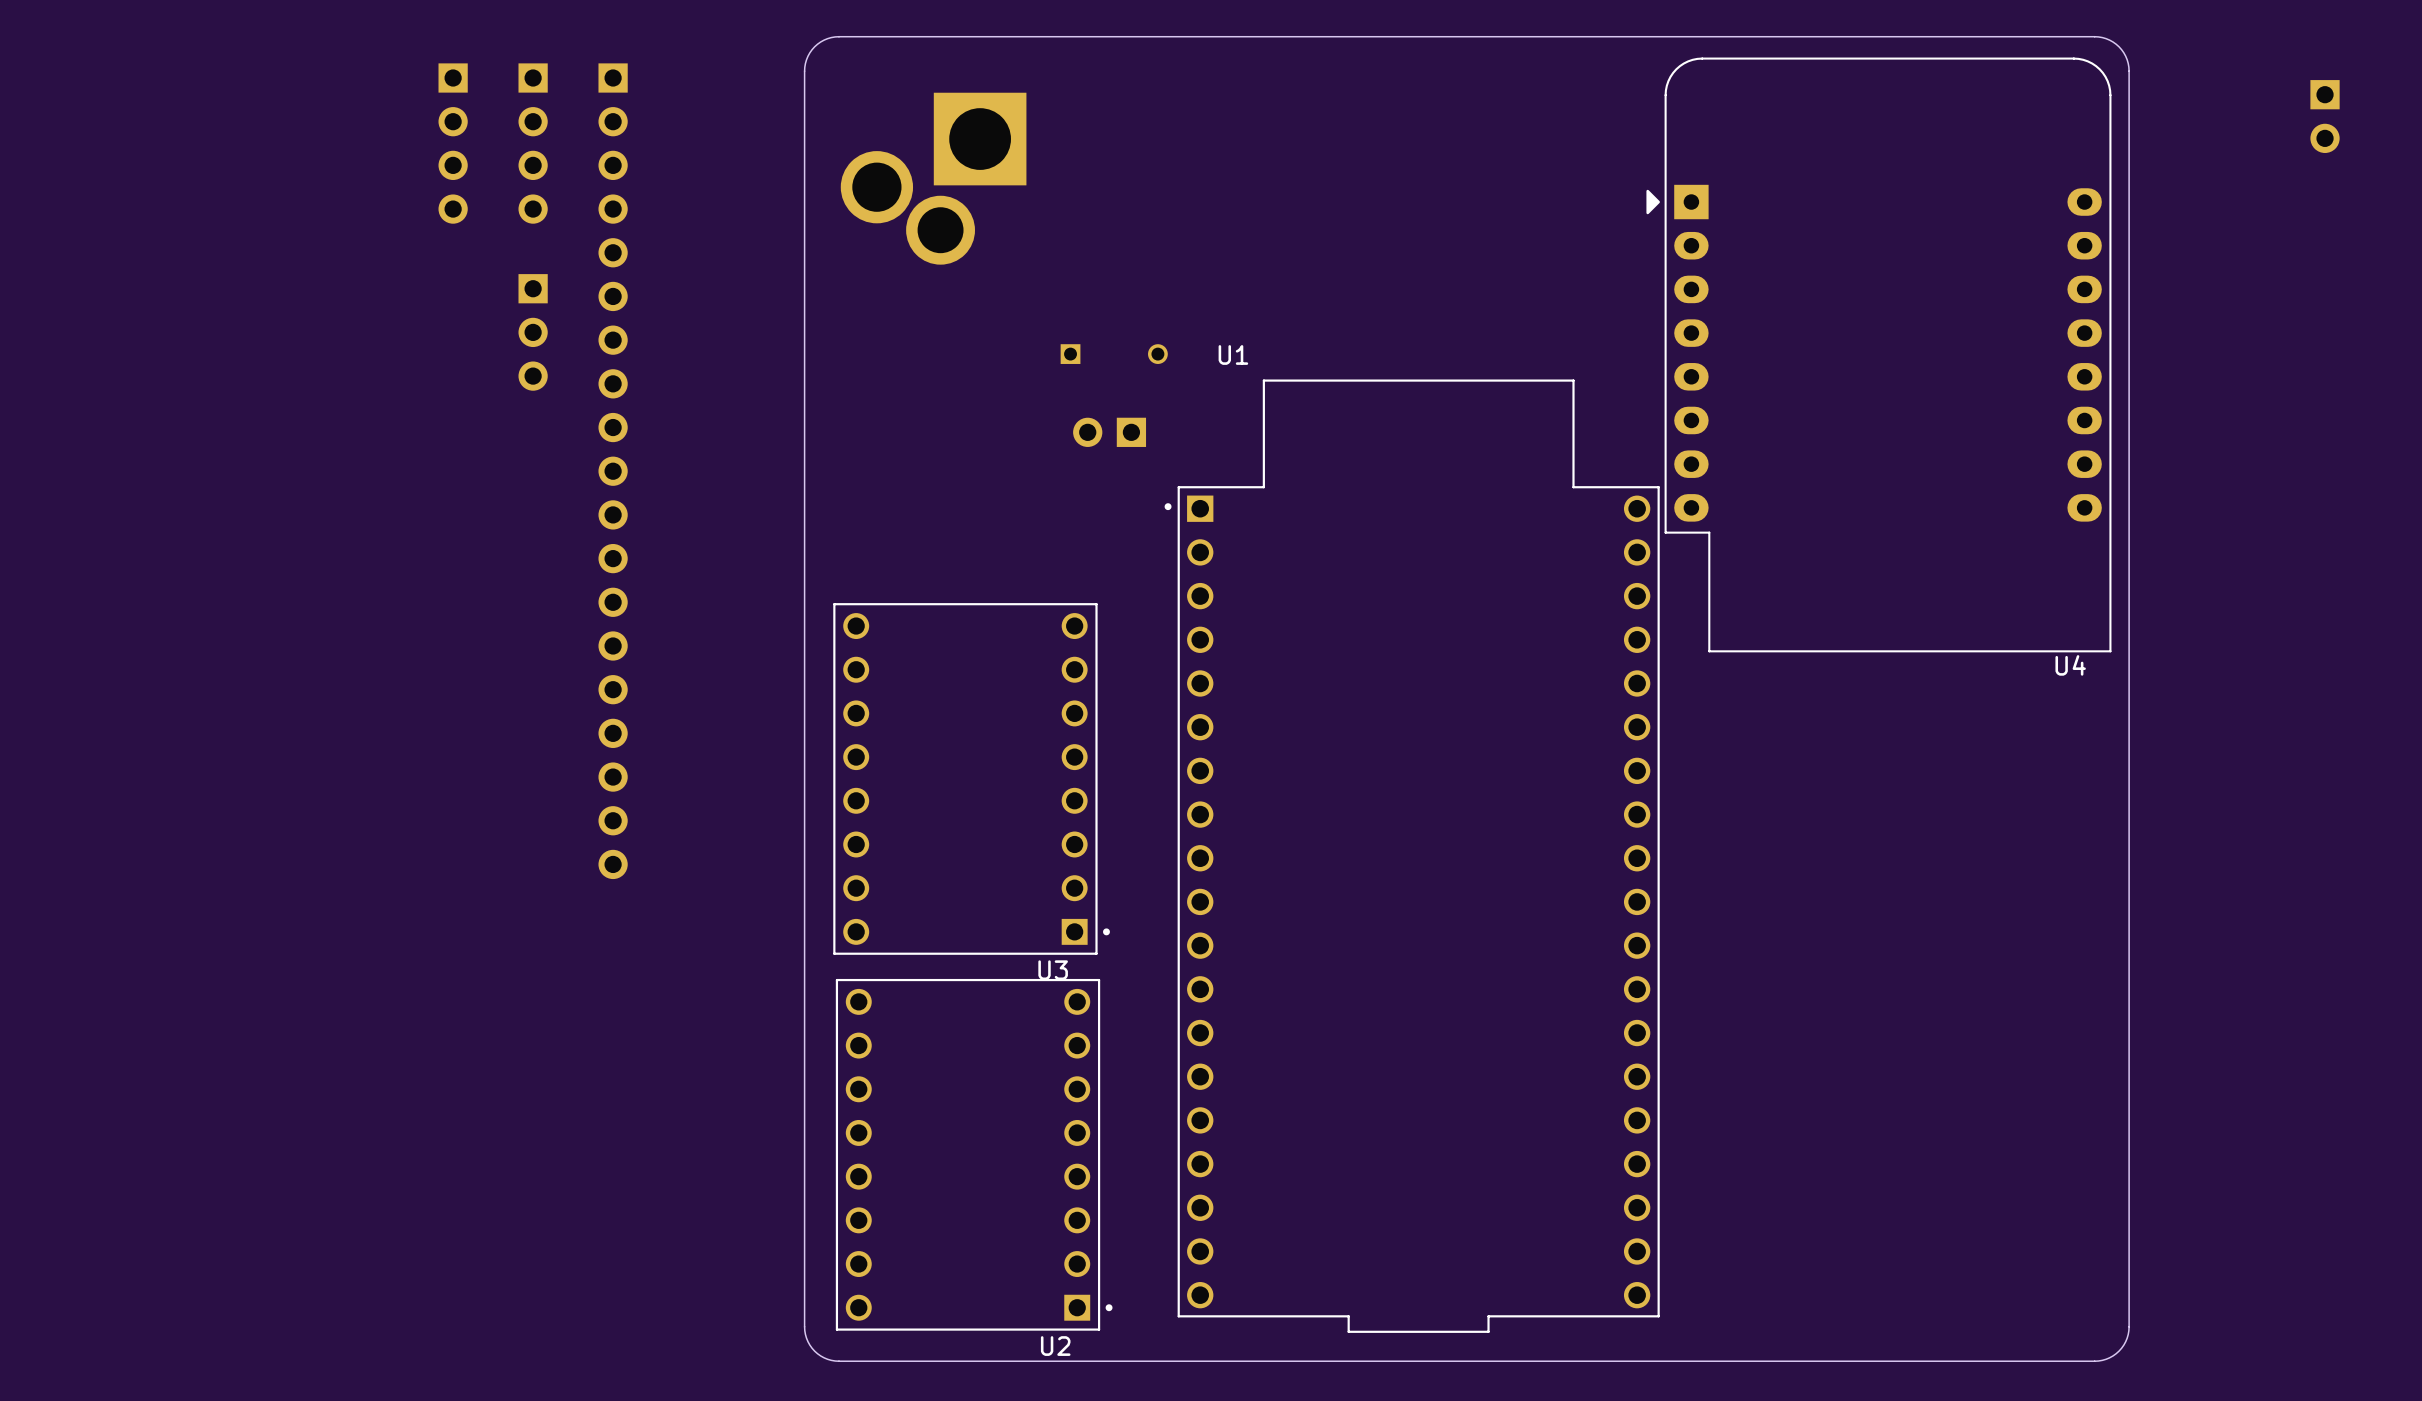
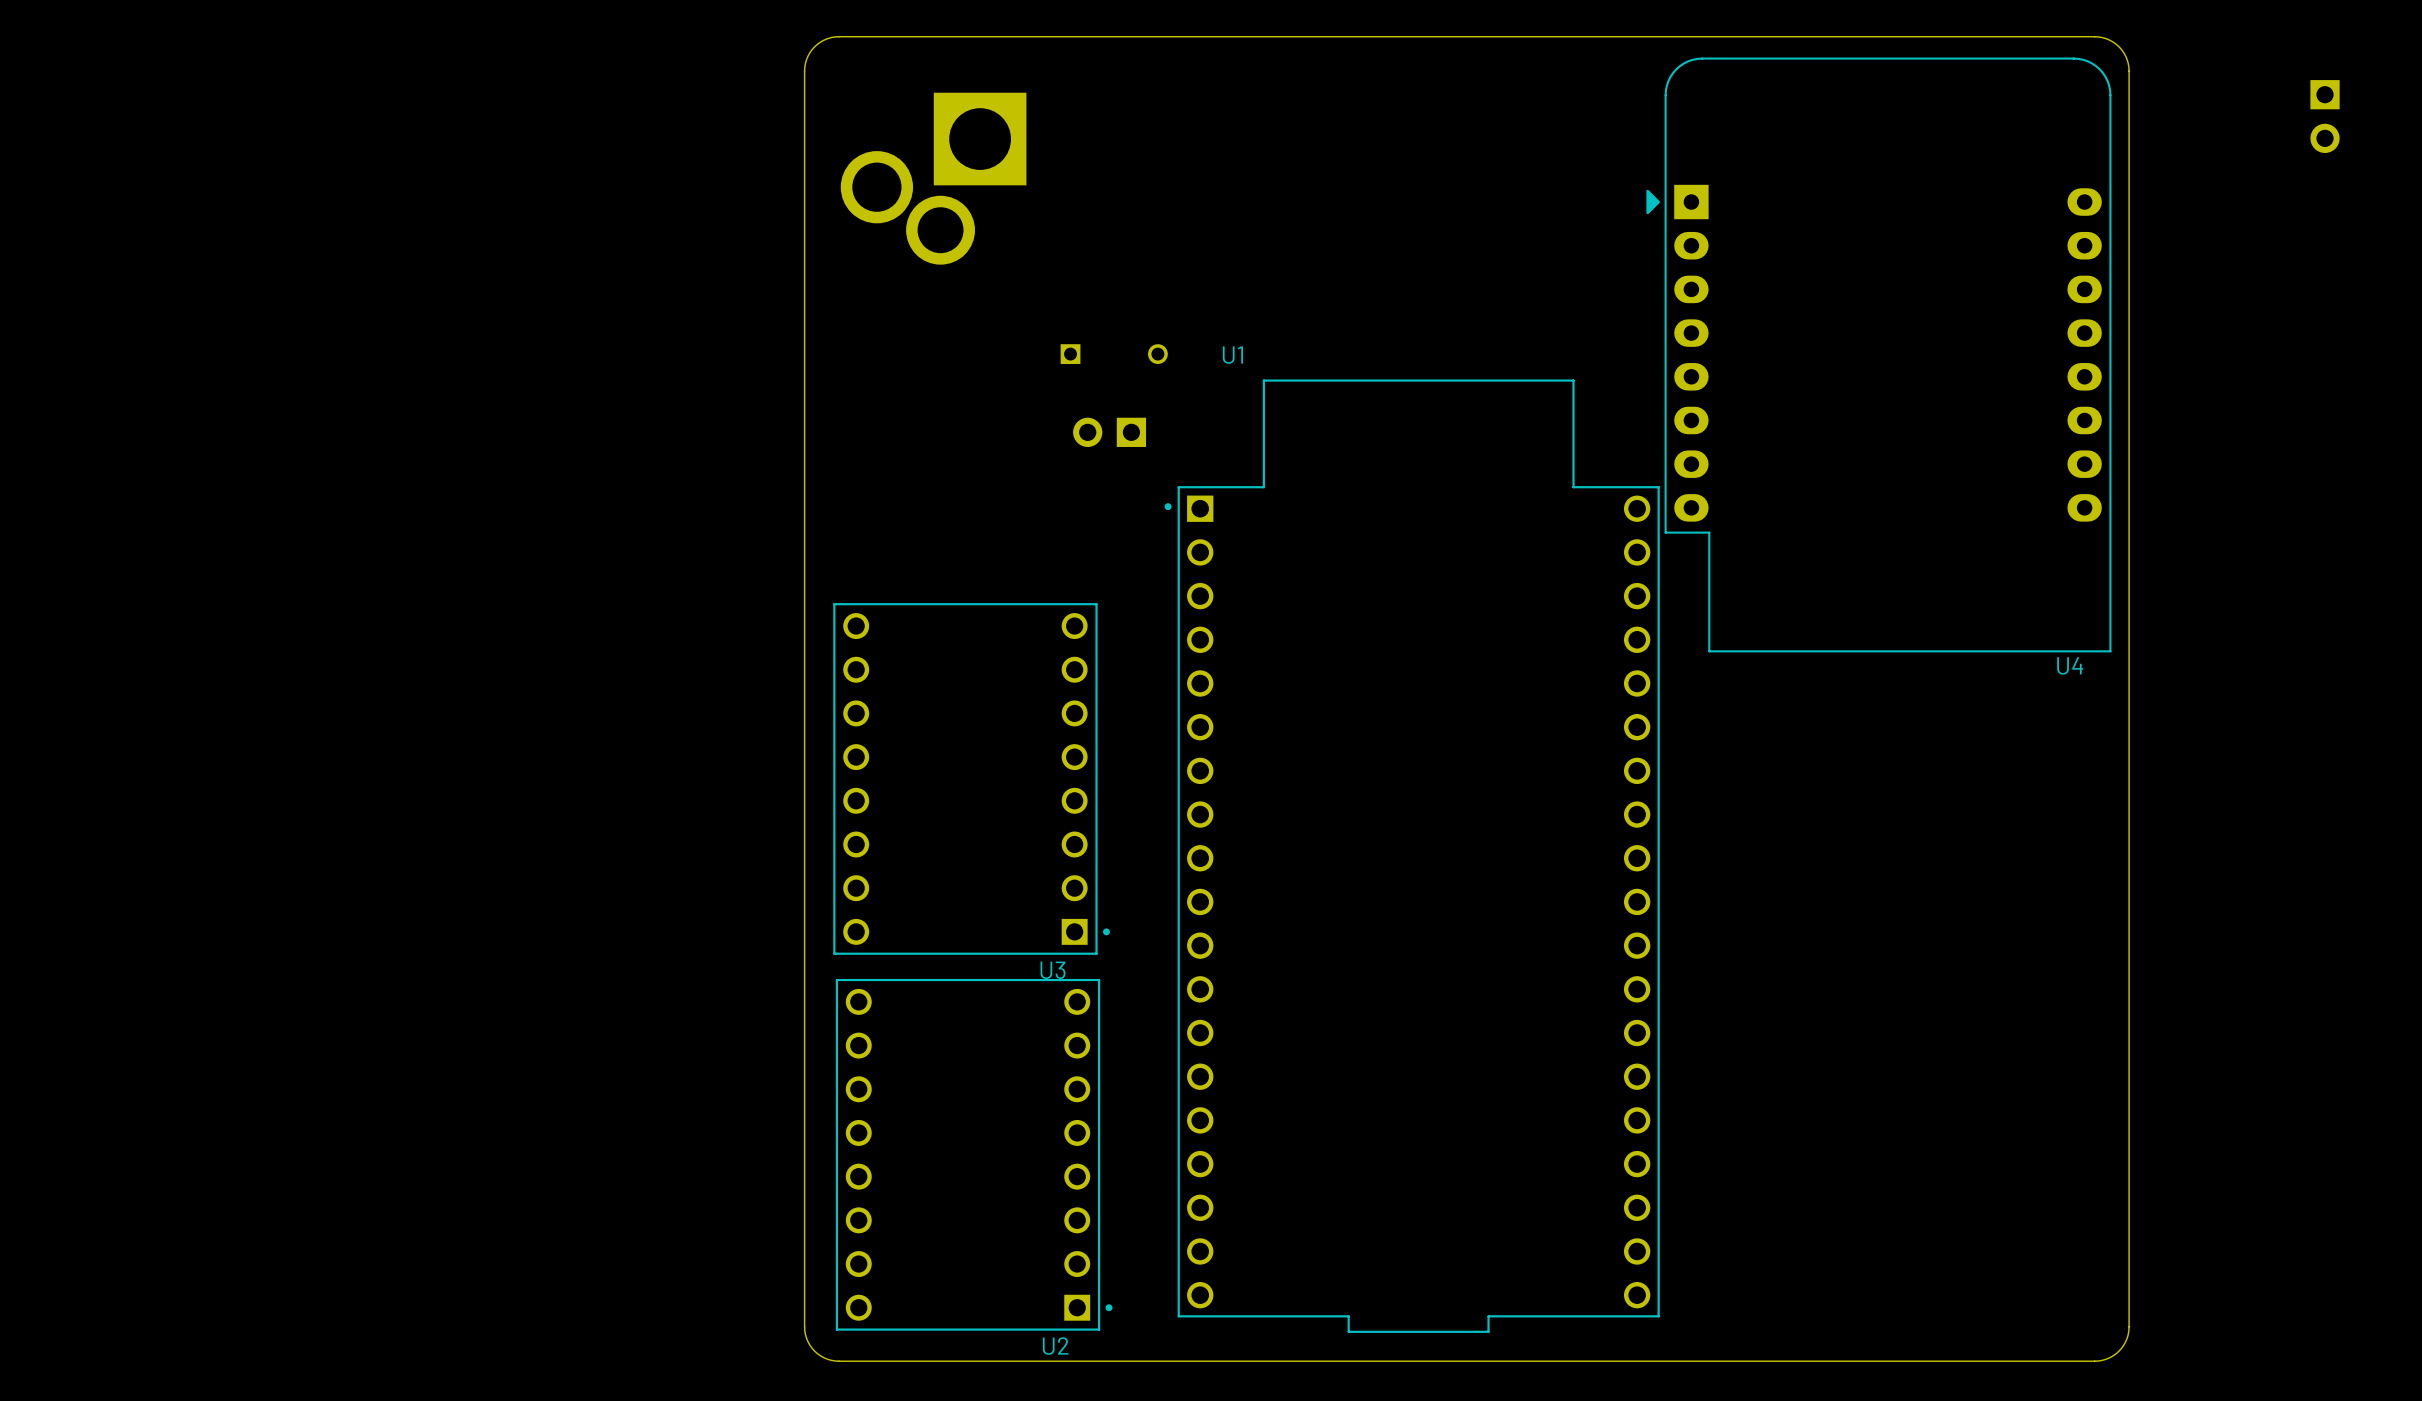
part: (453, 143) -> none
part: (533, 143) -> none
part: (533, 332) -> none
part: (613, 471) -> none

